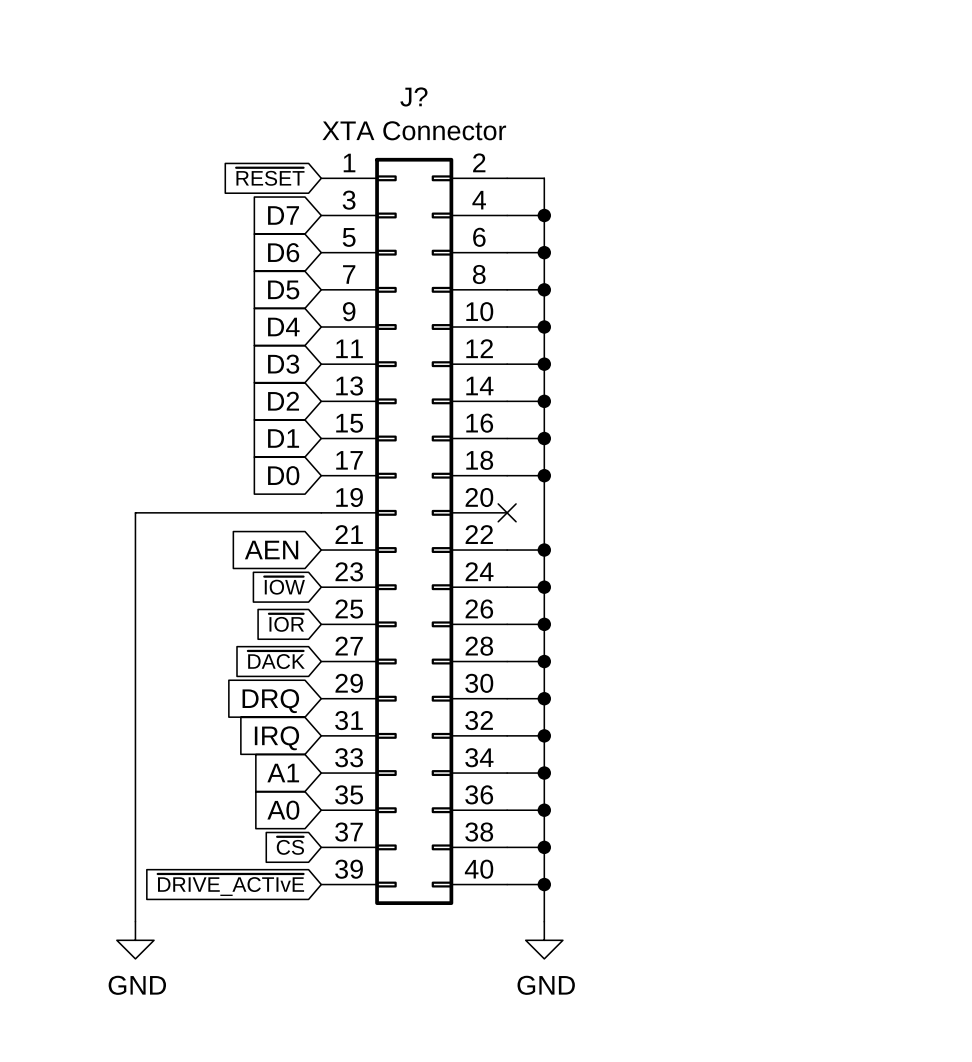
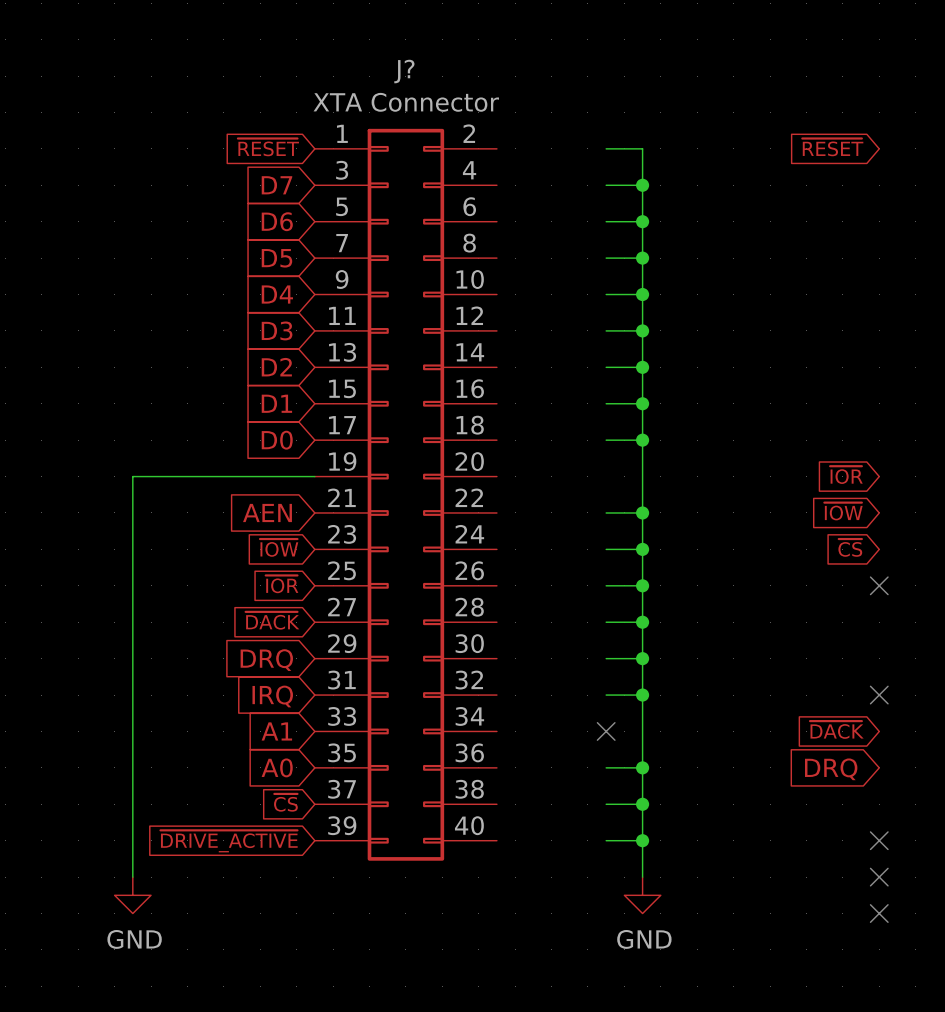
global label: none -> ~{RESET} (832, 147)
wire: (507, 178) (544, 178) (544, 921) -> (606, 148) (642, 148) (642, 877)
wire: (507, 215) (544, 215) -> (606, 185) (642, 185)
junction: (544, 215) -> none
junction: none -> (642, 185)
wire: (507, 252) (544, 252) -> (606, 221) (642, 221)
junction: (544, 252) -> none
junction: none -> (642, 221)
wire: (507, 289) (544, 289) -> (606, 258) (642, 258)
junction: (544, 289) -> none
junction: none -> (642, 258)
wire: (507, 327) (544, 327) -> (606, 294) (642, 294)
junction: (544, 327) -> none
junction: none -> (642, 294)
wire: (507, 364) (544, 364) -> (606, 330) (642, 330)
junction: (544, 364) -> none
junction: none -> (642, 330)
wire: (507, 401) (544, 401) -> (606, 367) (642, 367)
junction: (544, 401) -> none
junction: none -> (642, 367)
wire: (507, 438) (544, 438) -> (606, 403) (642, 403)
junction: (544, 438) -> none
junction: none -> (642, 403)
wire: (507, 475) (544, 475) -> (606, 440) (642, 440)
junction: (544, 475) -> none
junction: none -> (642, 440)
global label: none -> ~{IOR} (846, 475)
no-connect mark: (507, 512) -> none
global label: none -> ~{IOW} (843, 511)
wire: (507, 550) (544, 550) -> (606, 512) (642, 512)
junction: (544, 550) -> none
junction: none -> (642, 512)
global label: none -> ~{CS} (850, 547)
wire: (507, 587) (544, 587) -> (606, 549) (642, 549)
junction: (544, 587) -> none
junction: none -> (642, 549)
wire: (507, 624) (544, 624) -> (606, 585) (642, 585)
junction: (544, 624) -> none
junction: none -> (642, 585)
no-connect mark: none -> (879, 585)
wire: (507, 661) (544, 661) -> (606, 622) (642, 622)
junction: (544, 661) -> none
junction: none -> (642, 622)
wire: (507, 698) (544, 698) -> (606, 658) (642, 658)
junction: (544, 698) -> none
junction: none -> (642, 658)
wire: (507, 735) (544, 735) -> (606, 695) (642, 695)
junction: (544, 735) -> none
junction: none -> (642, 695)
no-connect mark: none -> (879, 695)
global label: none -> ~{DACK} (836, 729)
wire: (507, 773) (544, 773) -> none
junction: (544, 773) -> none
no-connect mark: none -> (606, 731)
wire: (507, 810) (544, 810) -> (606, 767) (642, 767)
junction: (544, 810) -> none
junction: none -> (642, 767)
global label: none -> DRQ (831, 769)
wire: (507, 847) (544, 847) -> (606, 804) (642, 804)
junction: (544, 847) -> none
junction: none -> (642, 804)
global label: ~{DRIVE_ACTIvE} (230, 884) -> ~{DRIVE_ACTIVE} (229, 841)
wire: (507, 884) (544, 884) -> (606, 840) (642, 840)
junction: (544, 884) -> none
junction: none -> (642, 840)
no-connect mark: none -> (879, 840)
no-connect mark: none -> (879, 877)
power symbol position: GND (544, 940) -> GND (642, 895)
no-connect mark: none -> (879, 913)

